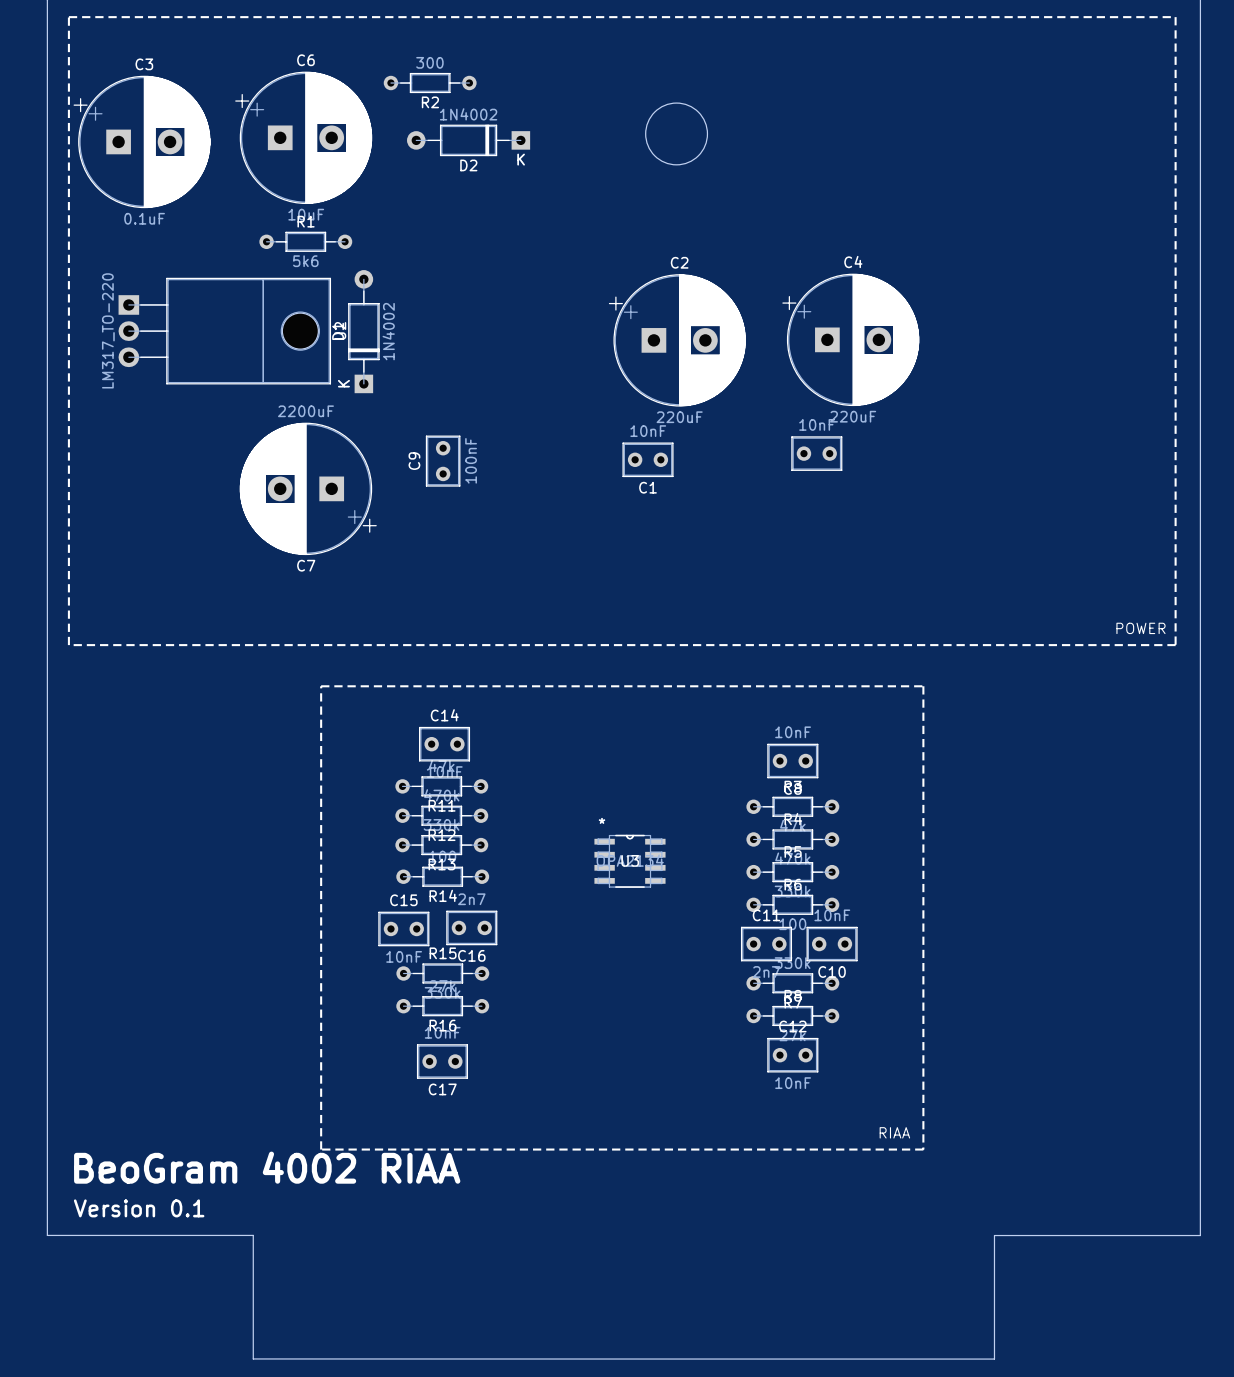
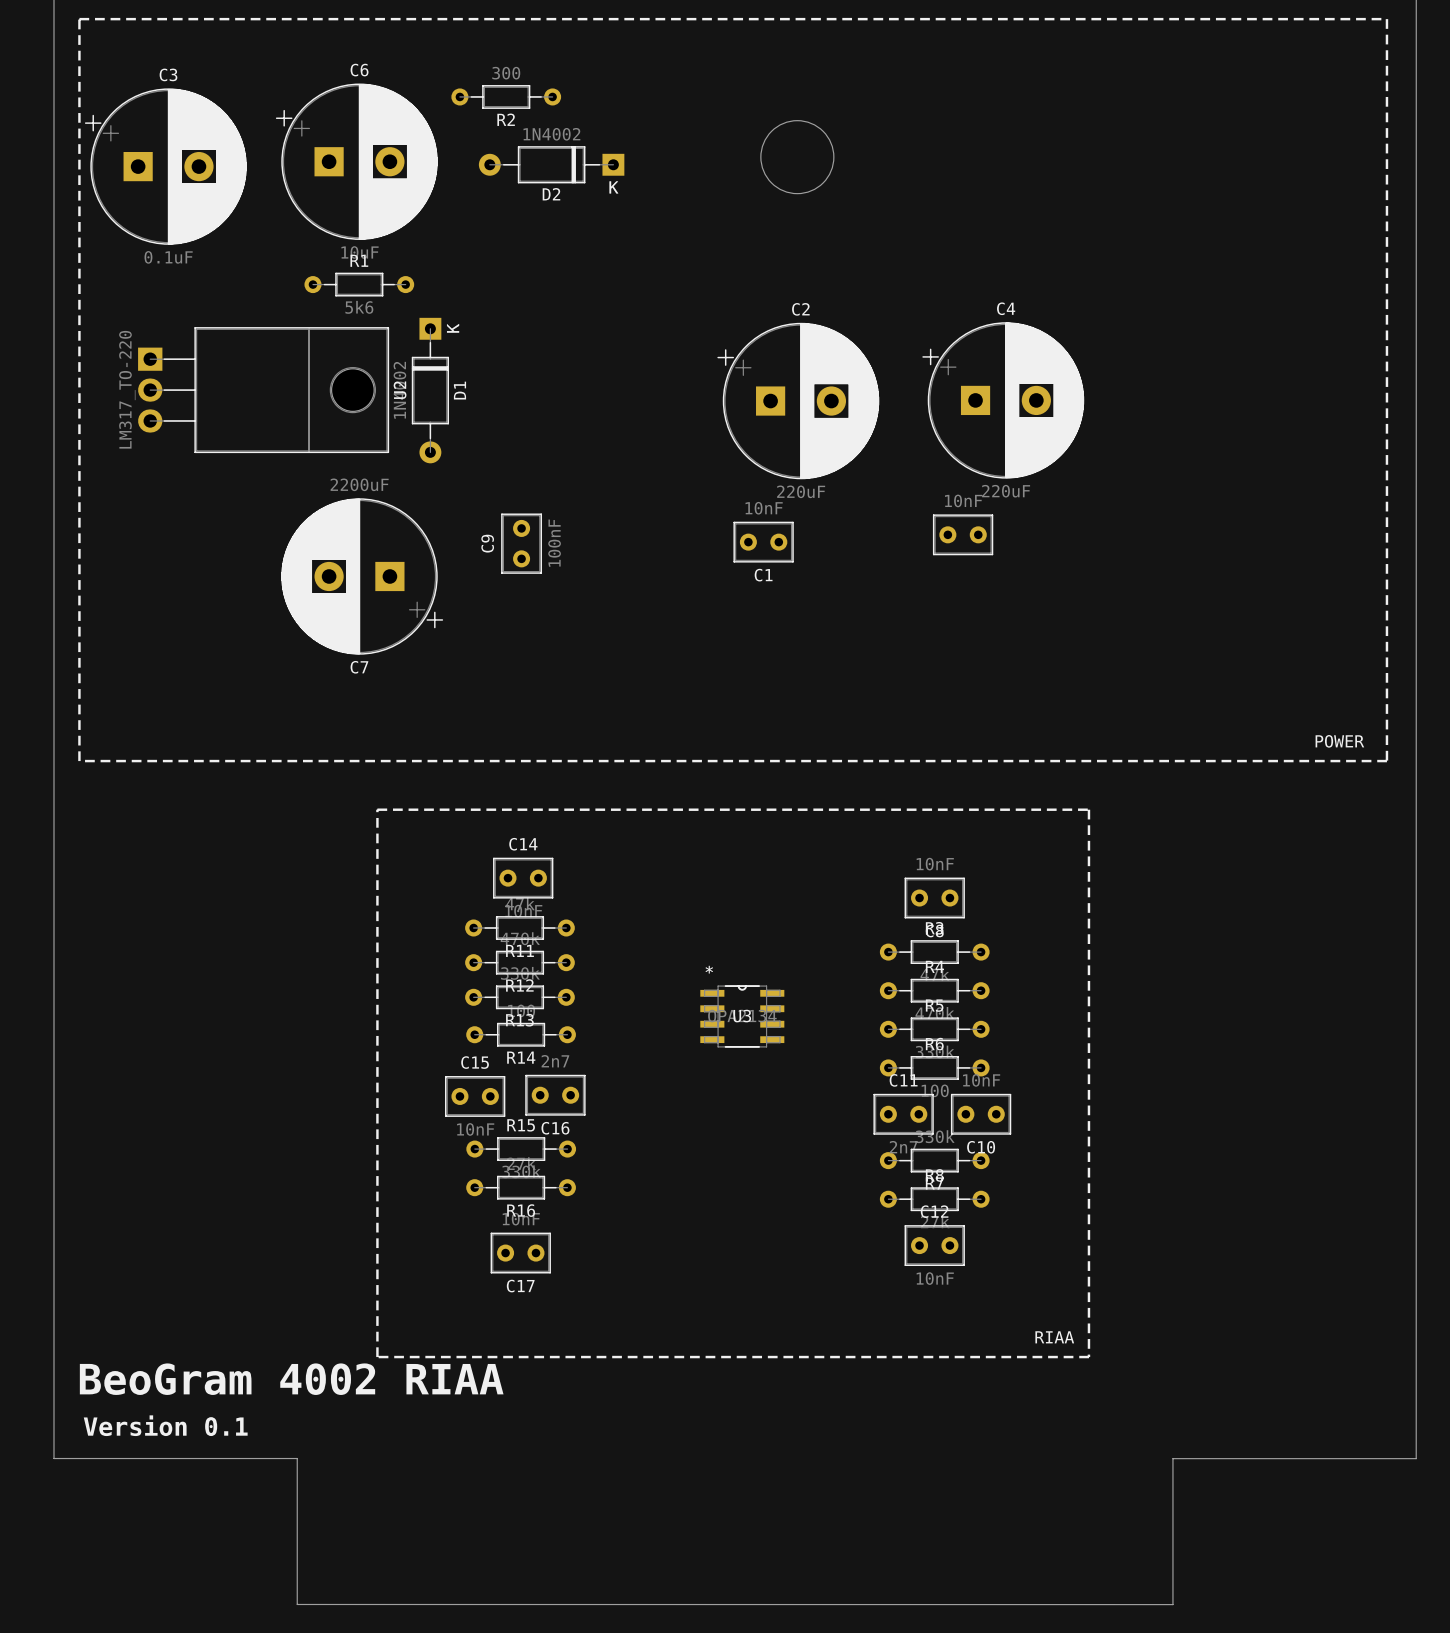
D1 rotation: 0° (363, 331) -> 180° (430, 390)

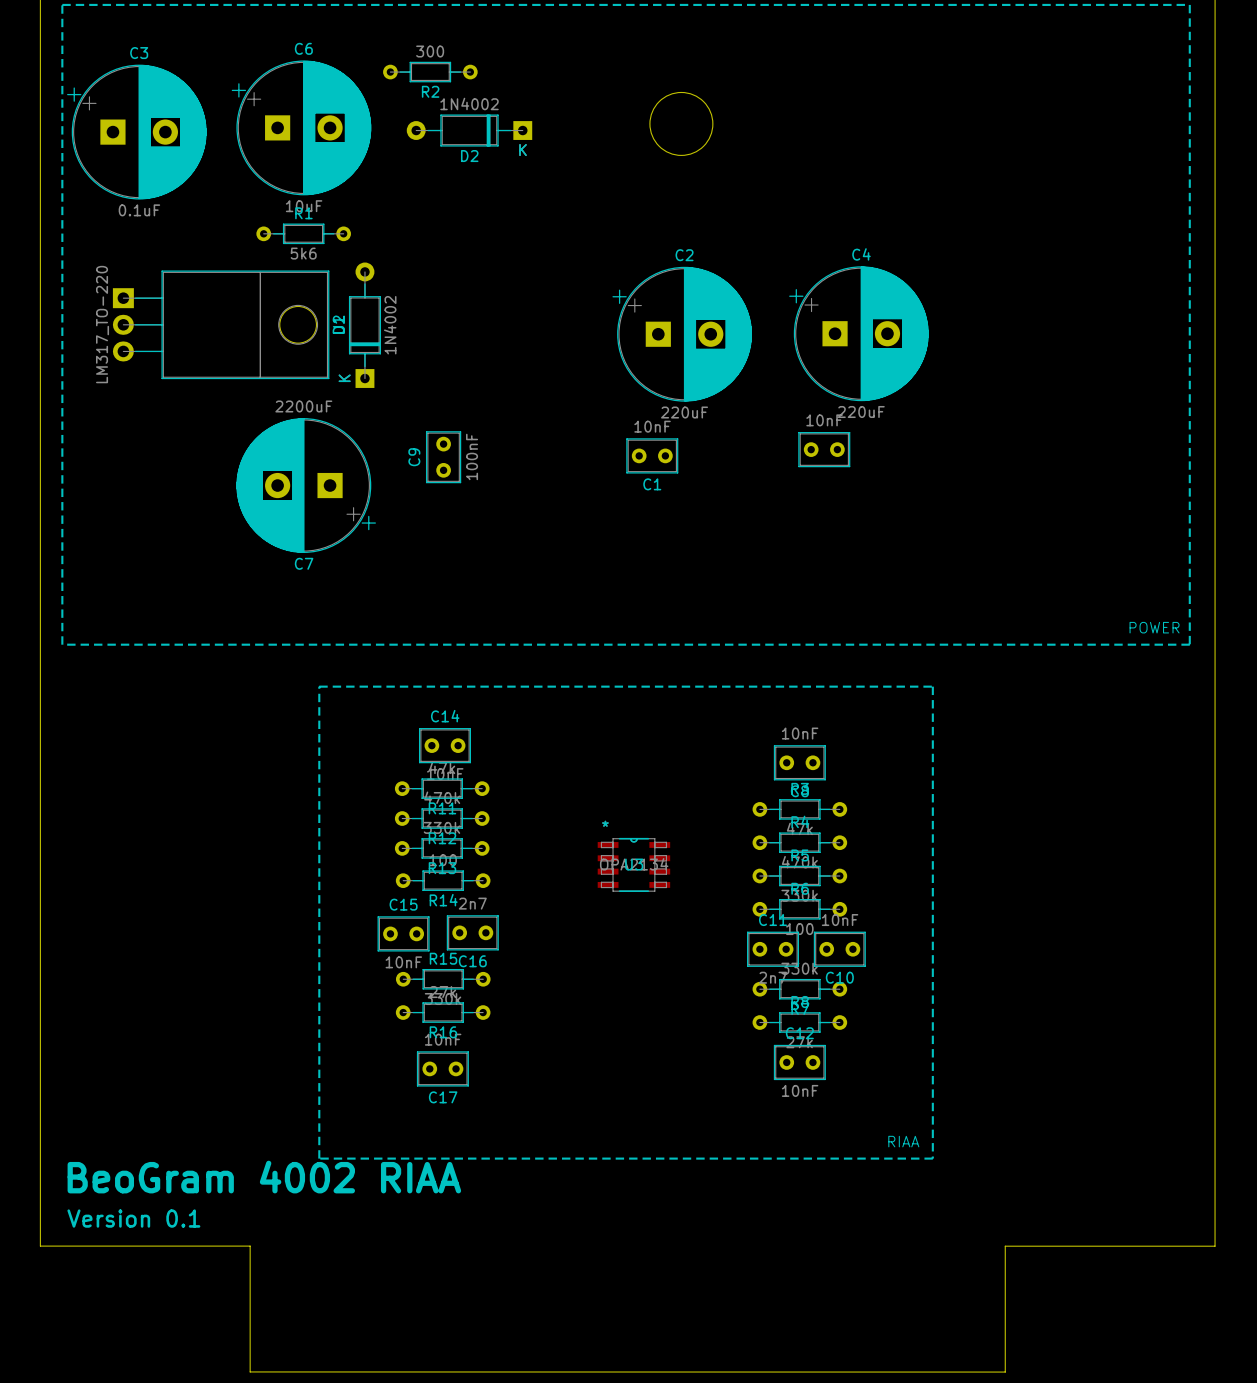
D1 rotation: 0° (430, 390) -> 180° (364, 325)

